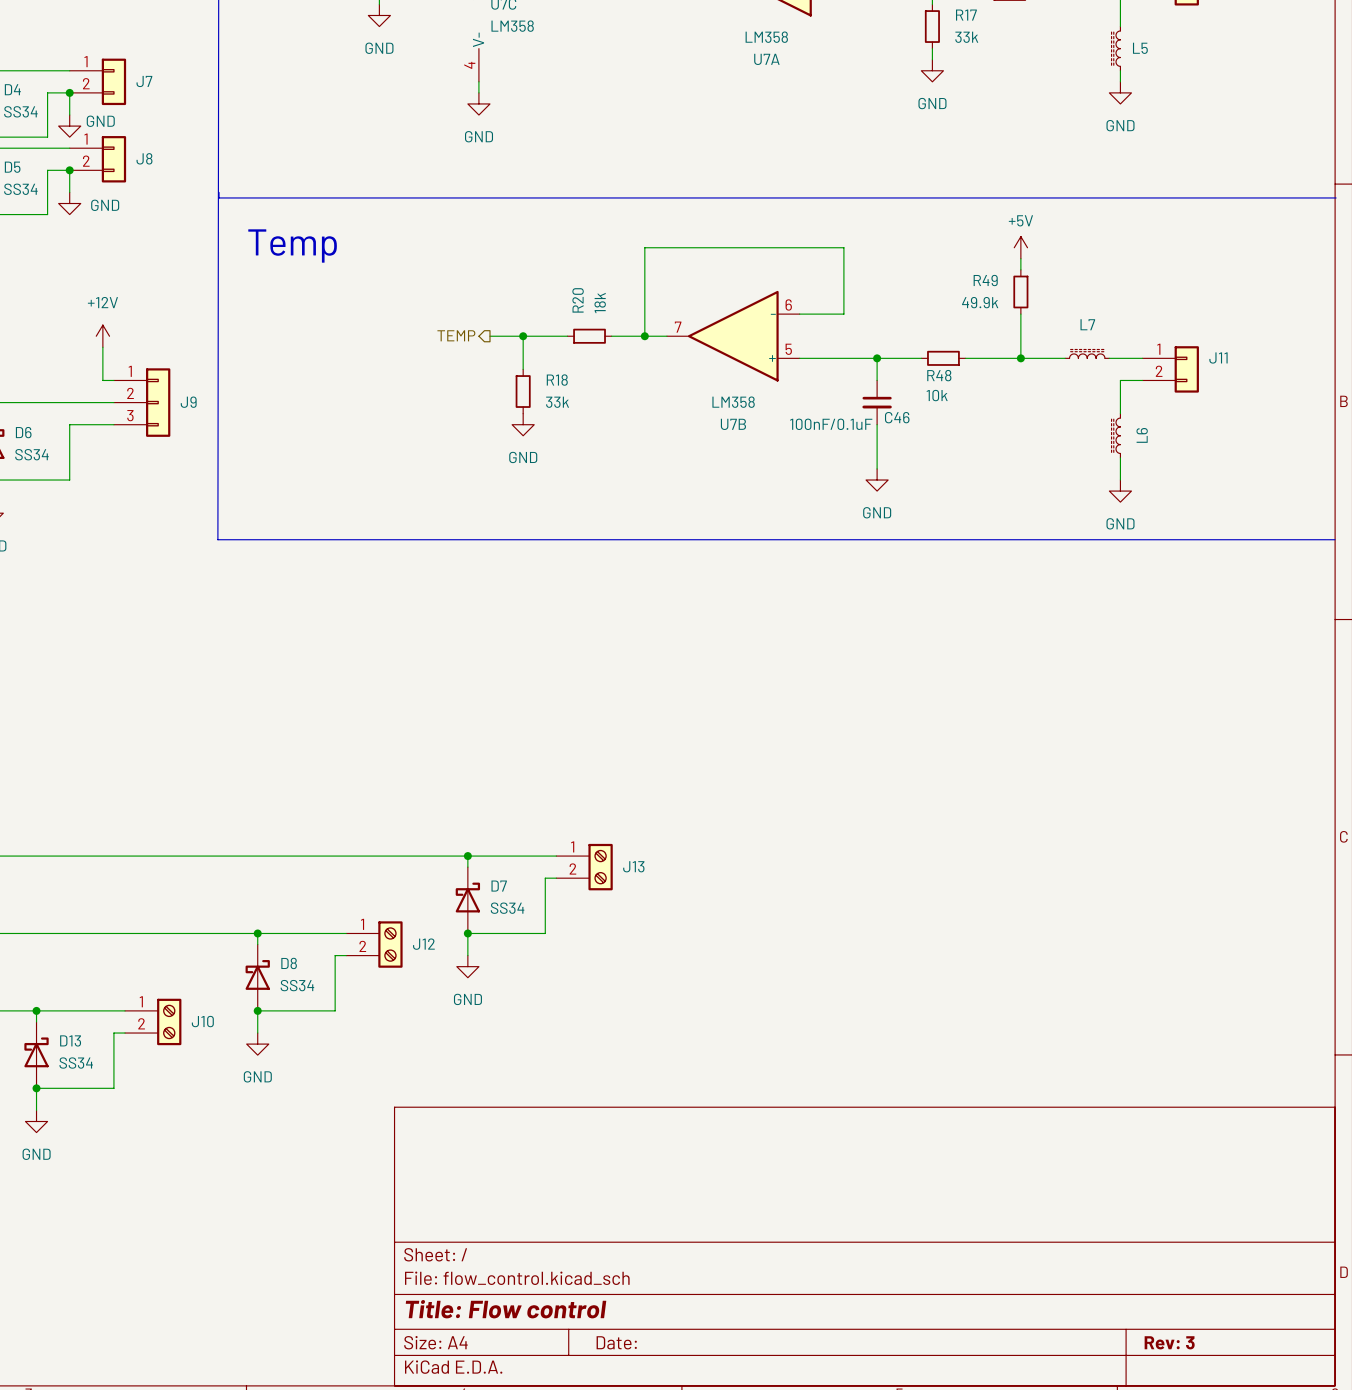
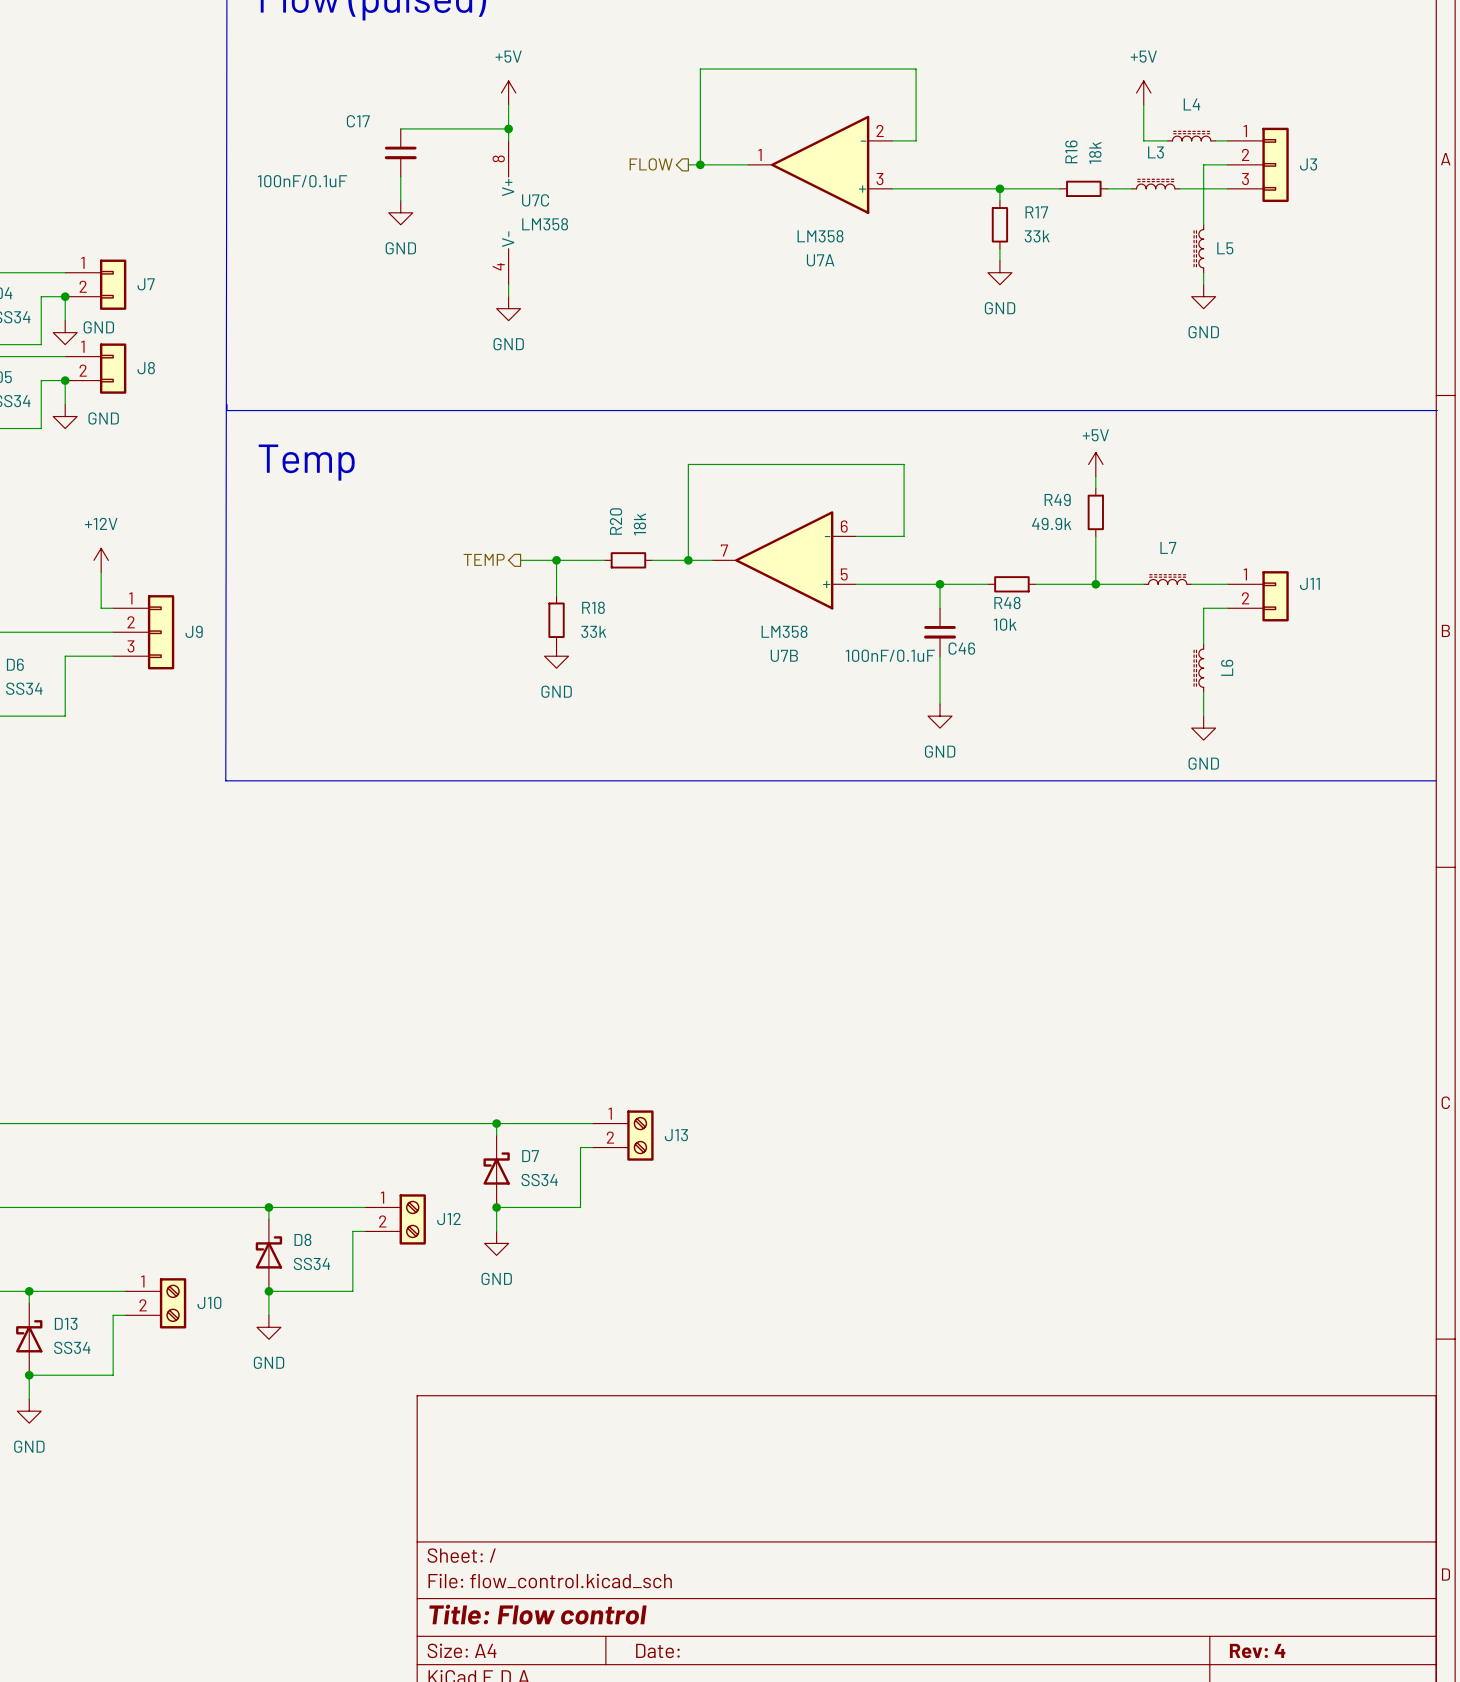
title block: Rev: 3 (1169, 1342) -> Rev: 4 (1257, 1650)

